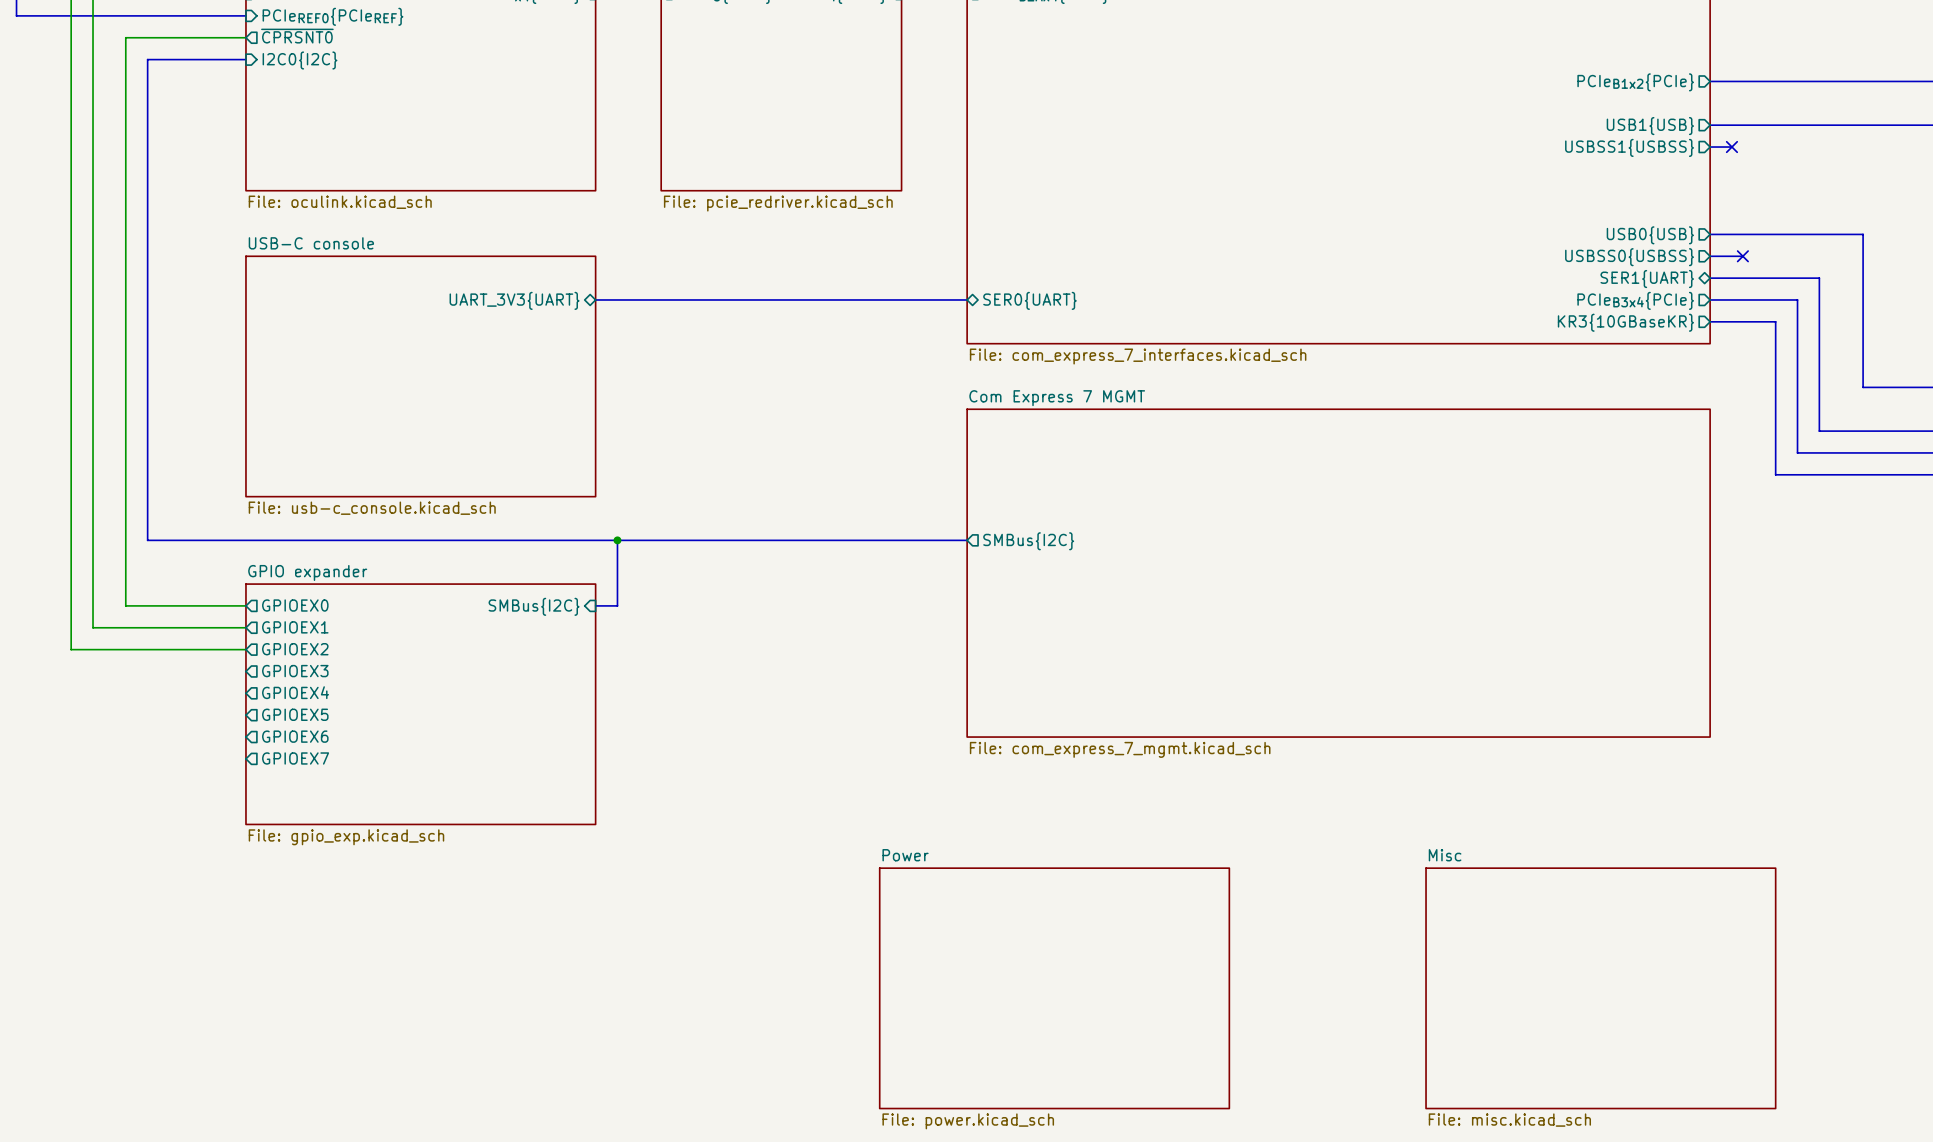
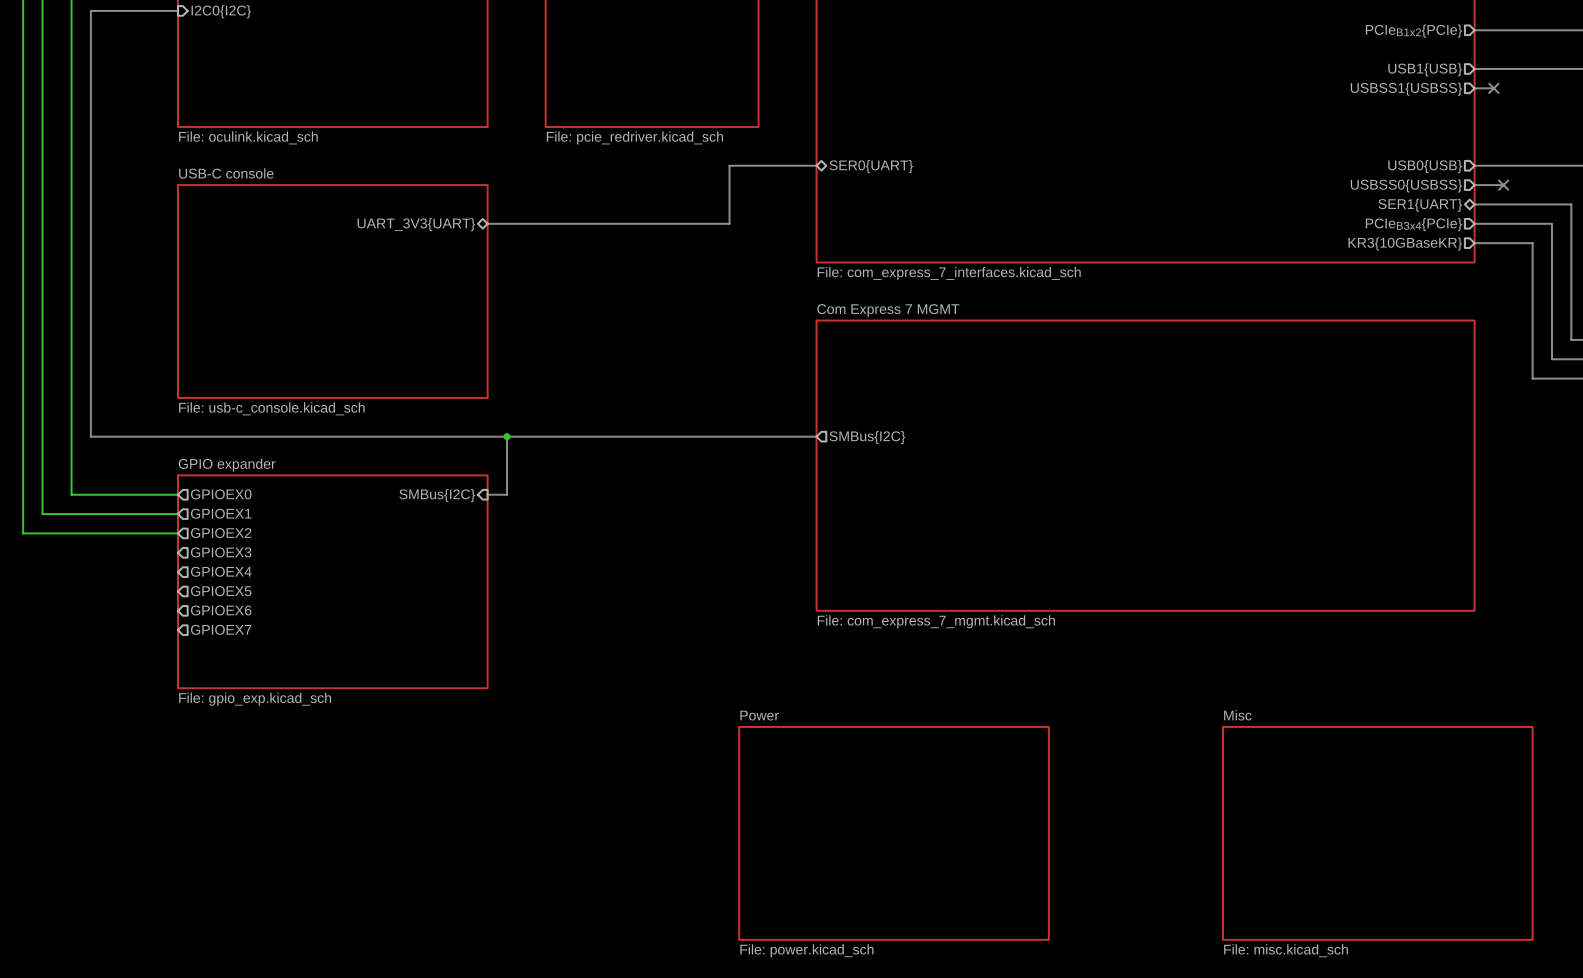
bus: (868, 299) (967, 299) -> (729, 223) (729, 165) (816, 165)
sheet pin position: SER0{UART} (1029, 300) -> SER0{UART} (871, 166)

